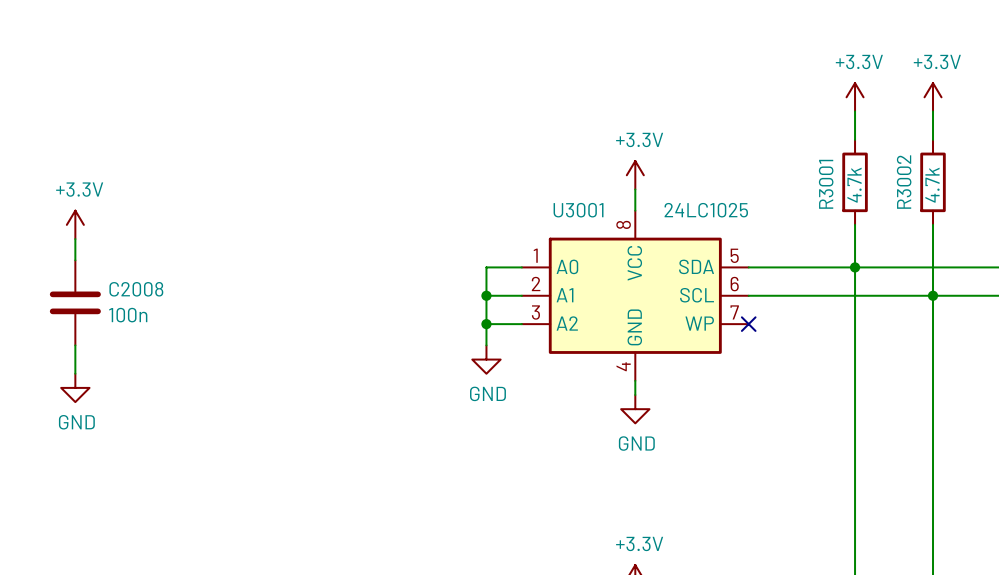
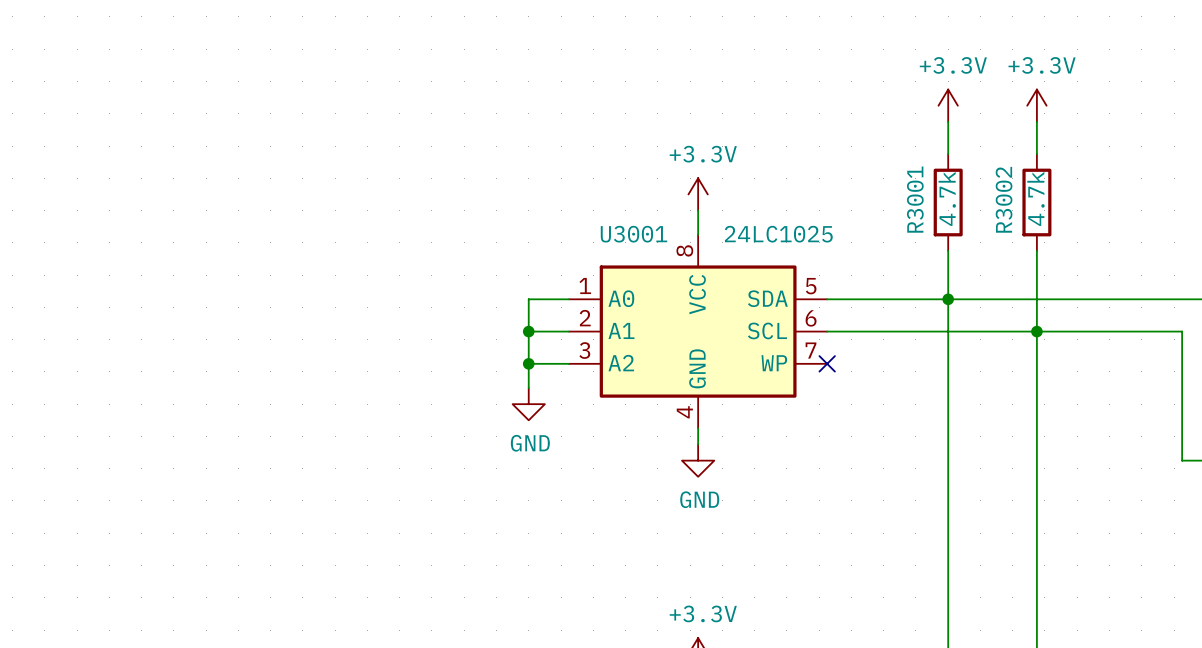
power symbol: +3.3V (75, 224) -> none
wire: (75, 239) (75, 260) -> none
C2008: 100n (75, 302) -> none
wire: (75, 345) (75, 373) -> none
power symbol: GND (75, 387) -> none

